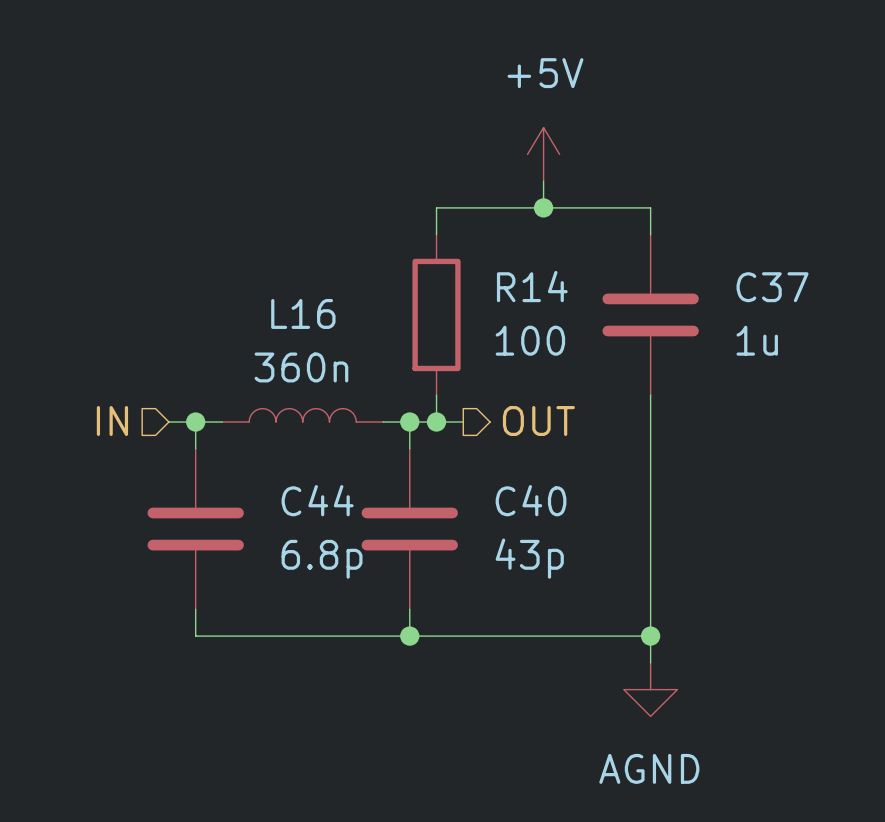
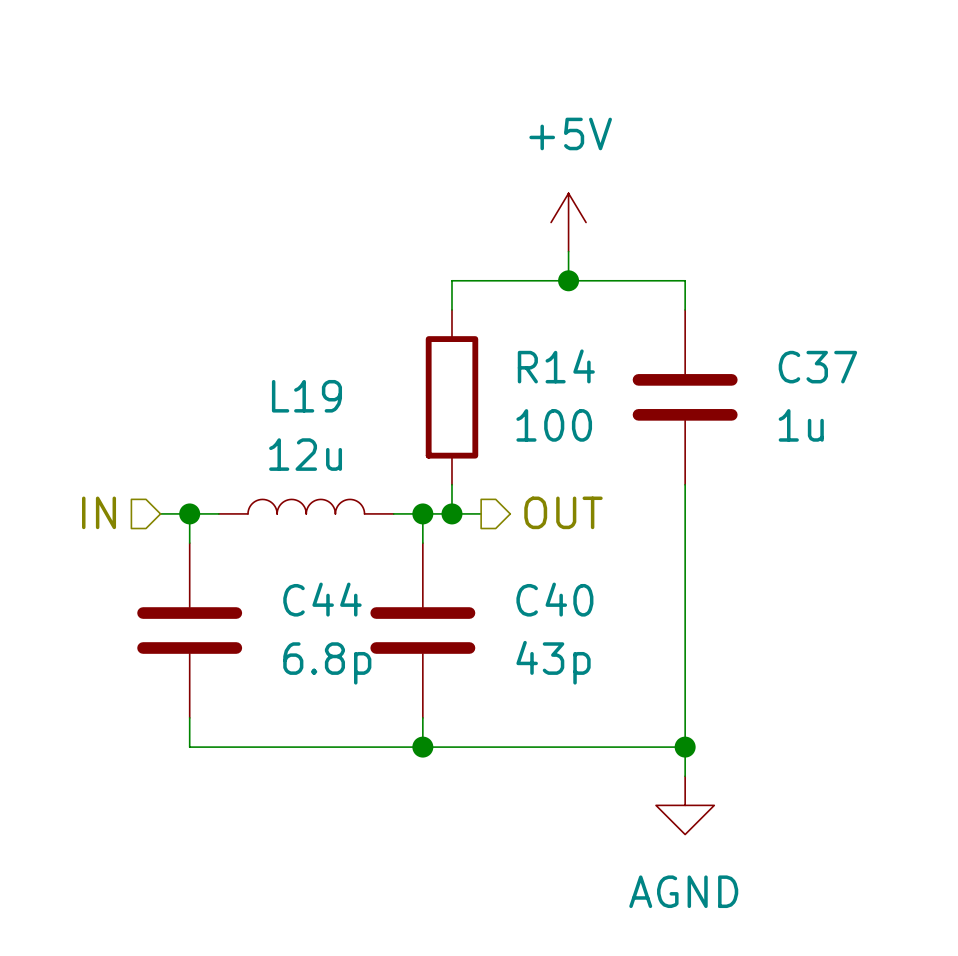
L16 name: L16 (303, 313) -> L19 (306, 396)
L16 value: 360n (301, 367) -> 12u (305, 454)

